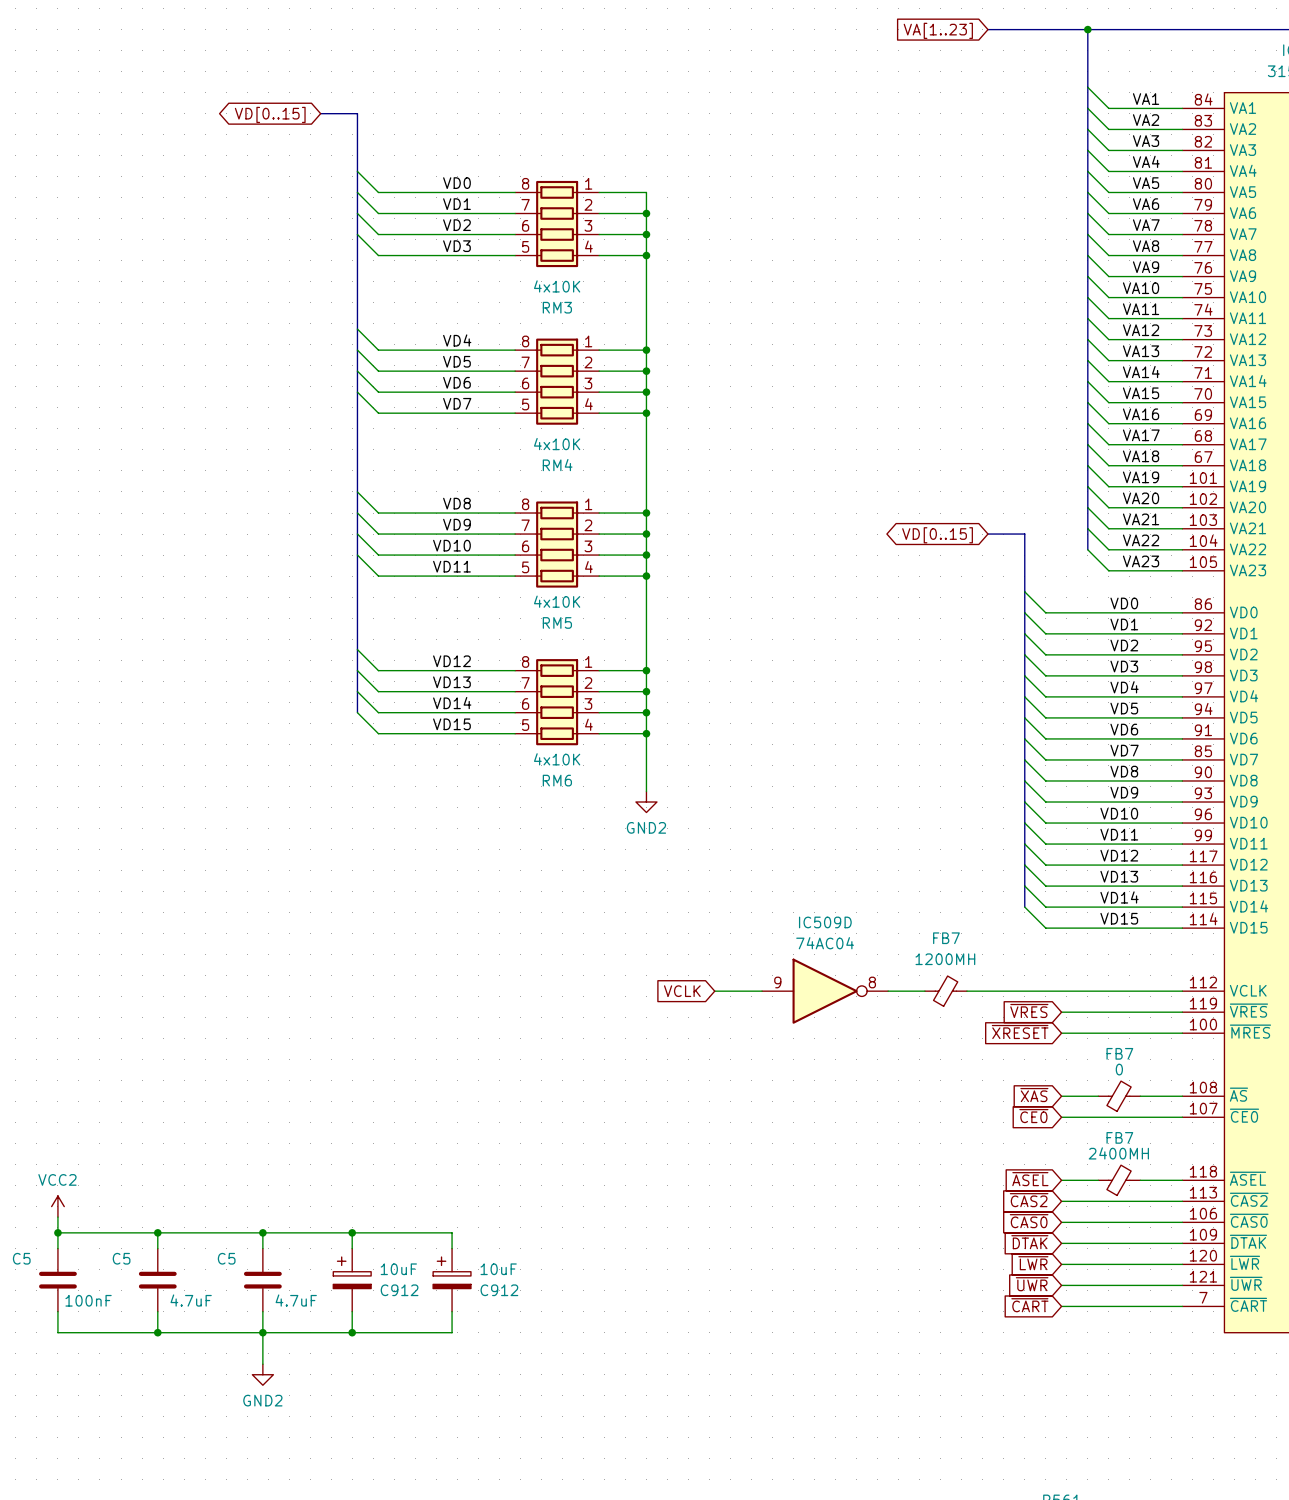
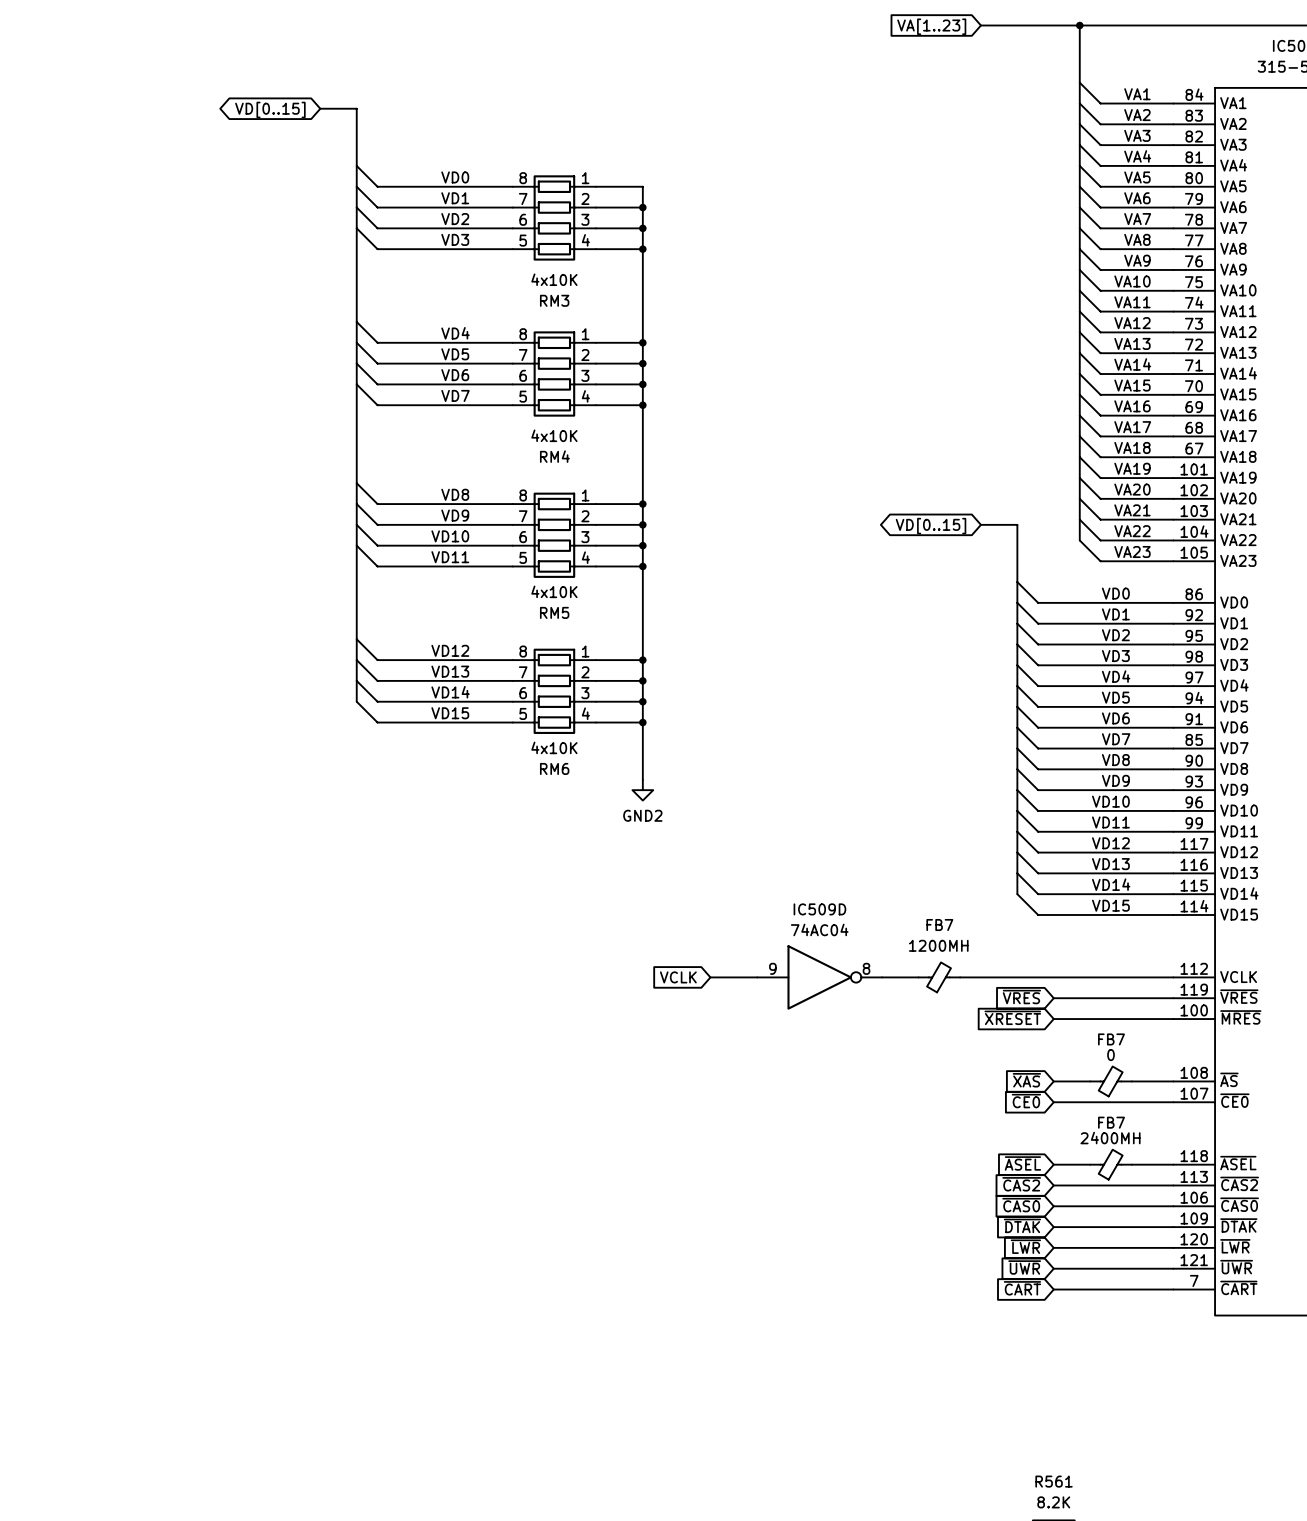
power symbol: VCC2 (57, 1206) -> none
wire: (57, 1217) (57, 1248) -> none
wire: (57, 1232) (452, 1232) (452, 1248) -> none
junction: (57, 1232) -> none
wire: (157, 1232) (157, 1248) -> none
junction: (157, 1232) -> none
wire: (262, 1232) (262, 1248) -> none
junction: (262, 1232) -> none
wire: (352, 1232) (352, 1248) -> none
junction: (352, 1232) -> none
C5: 100nF (57, 1280) -> none
C5: 4.7uF (157, 1280) -> none
C5: 4.7uF (262, 1280) -> none
C912: 10uF (352, 1280) -> none
C912: 10uF (452, 1280) -> none
wire: (57, 1311) (57, 1332) (452, 1332) (452, 1311) -> none
wire: (157, 1311) (157, 1332) -> none
wire: (262, 1311) (262, 1364) -> none
wire: (352, 1311) (352, 1332) -> none
junction: (157, 1332) -> none
junction: (262, 1332) -> none
junction: (352, 1332) -> none
power symbol: GND2 (262, 1374) -> none

